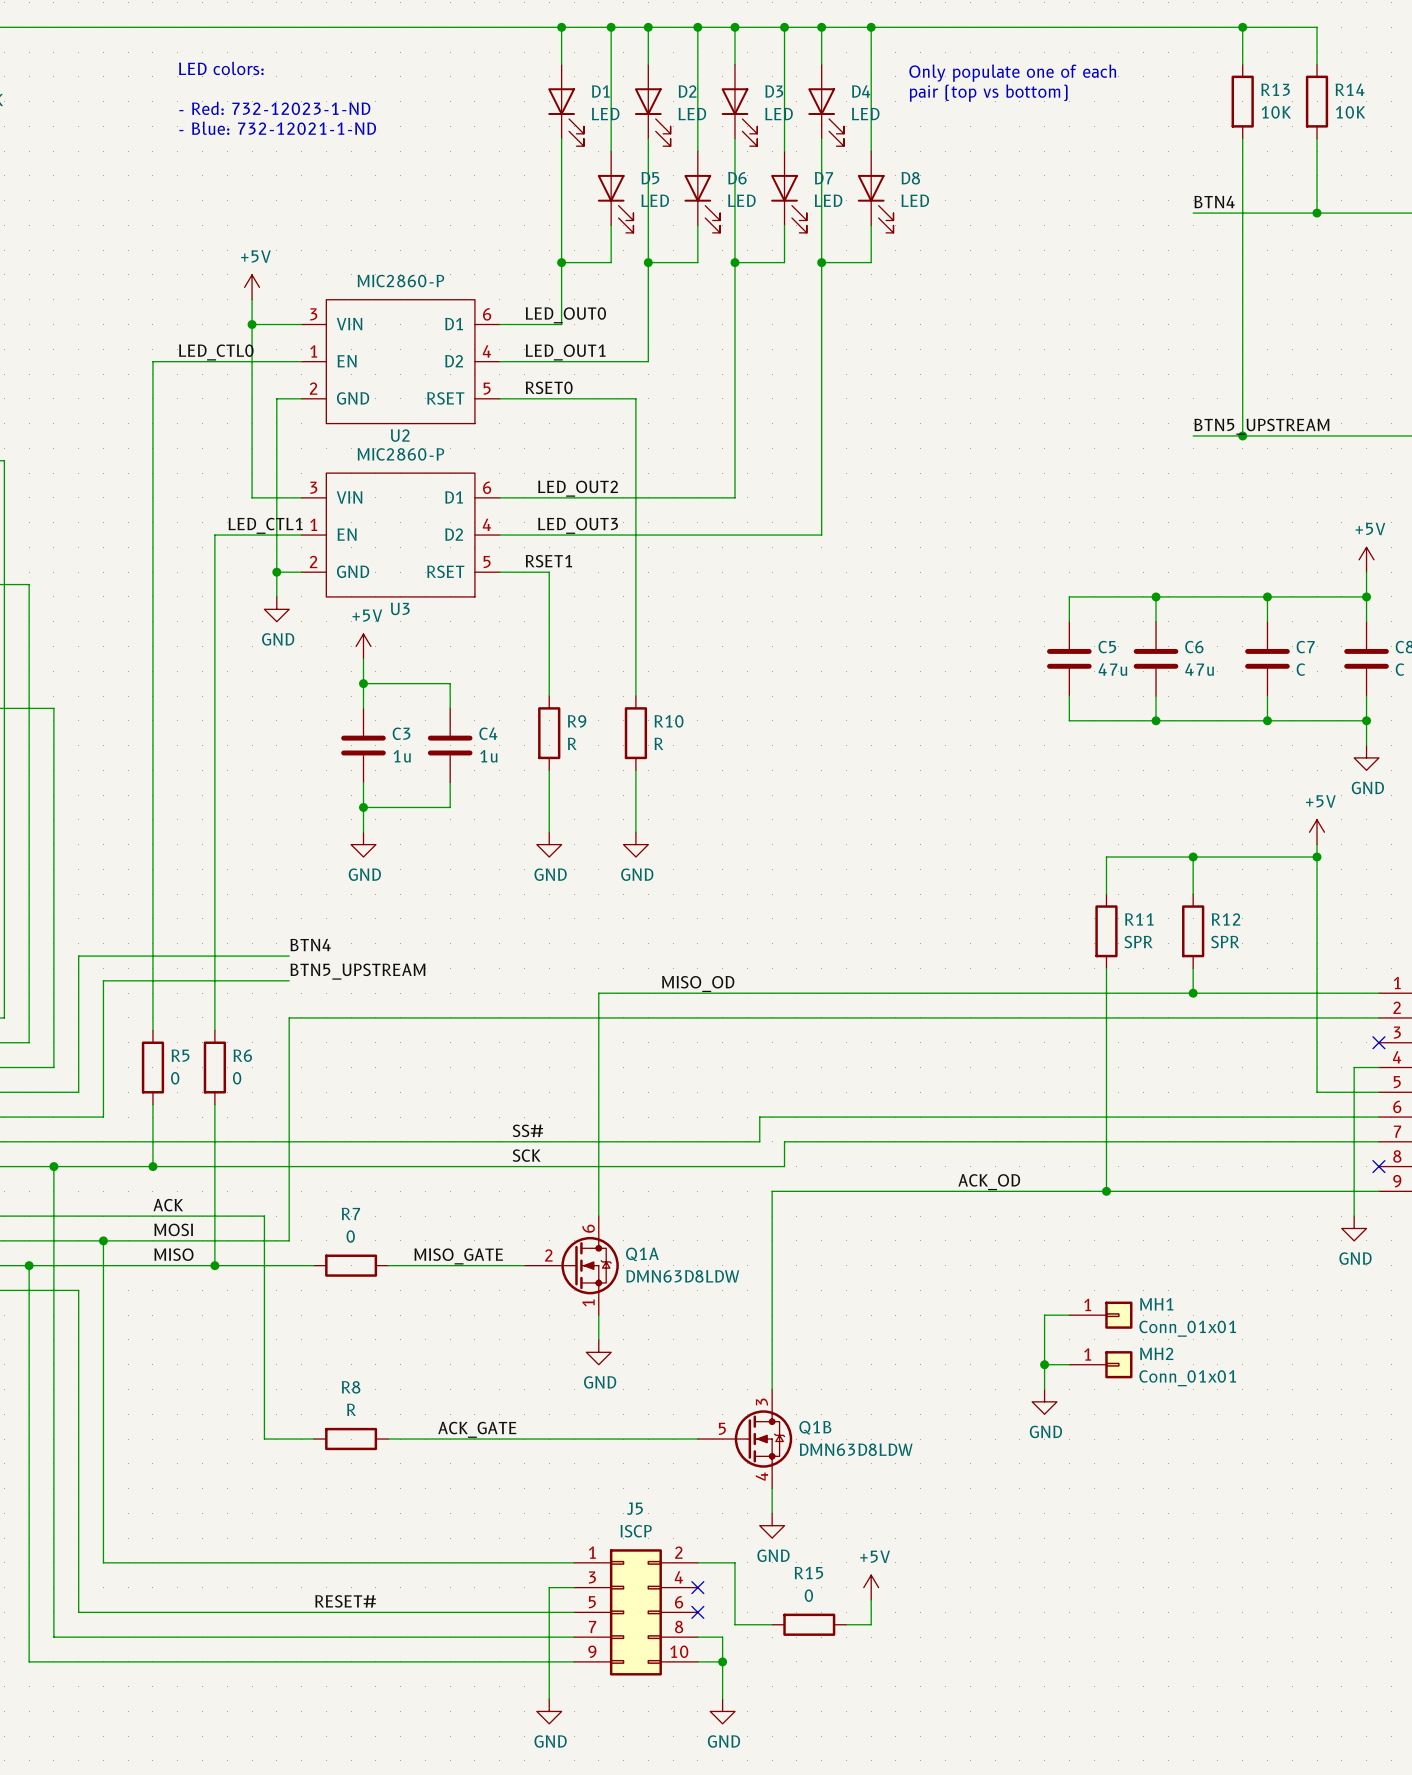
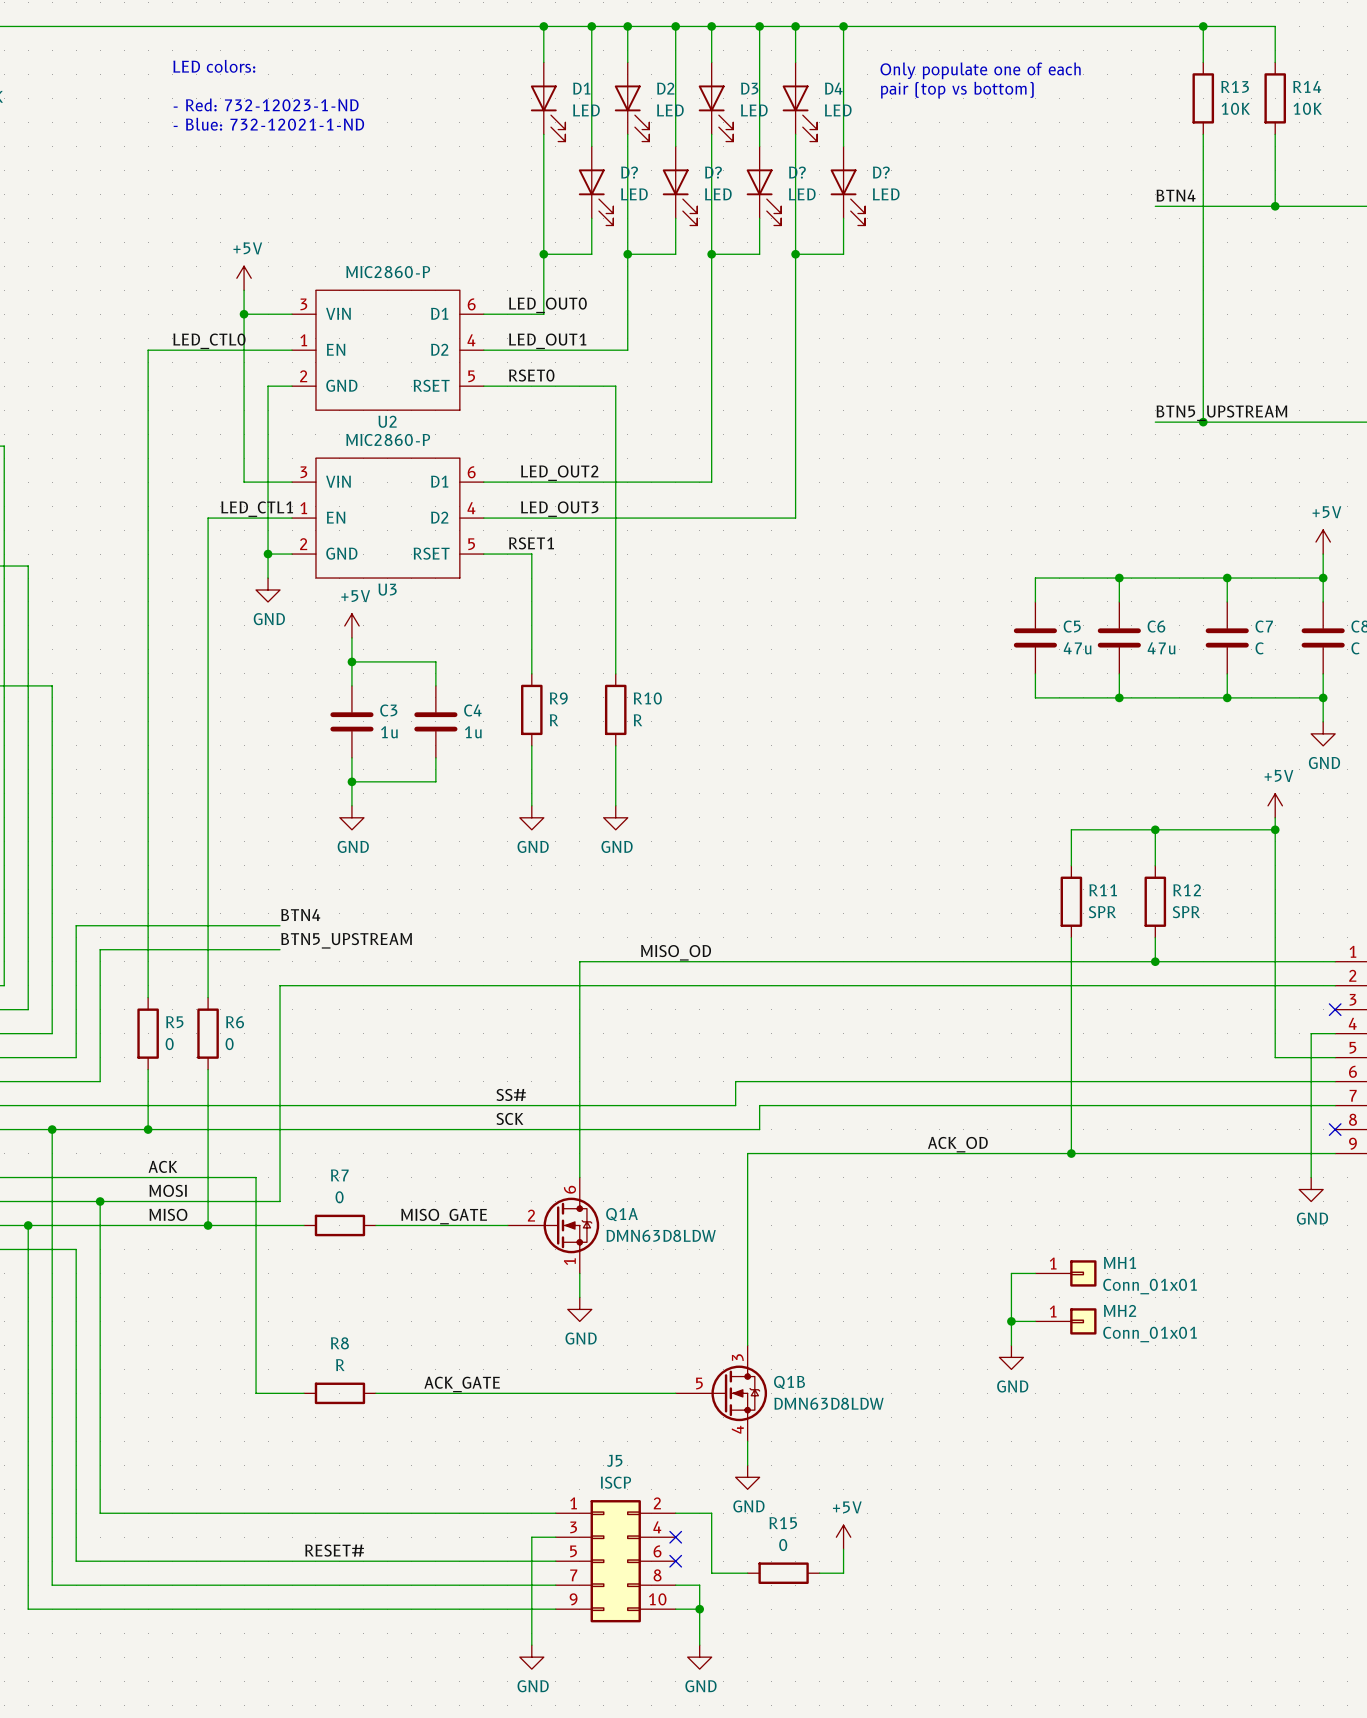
D5 name: D5 (650, 178) -> D? (629, 172)
D6 name: D6 (737, 178) -> D? (713, 172)
D7 name: D7 (823, 178) -> D? (797, 172)
D8 name: D8 (910, 178) -> D? (881, 172)

